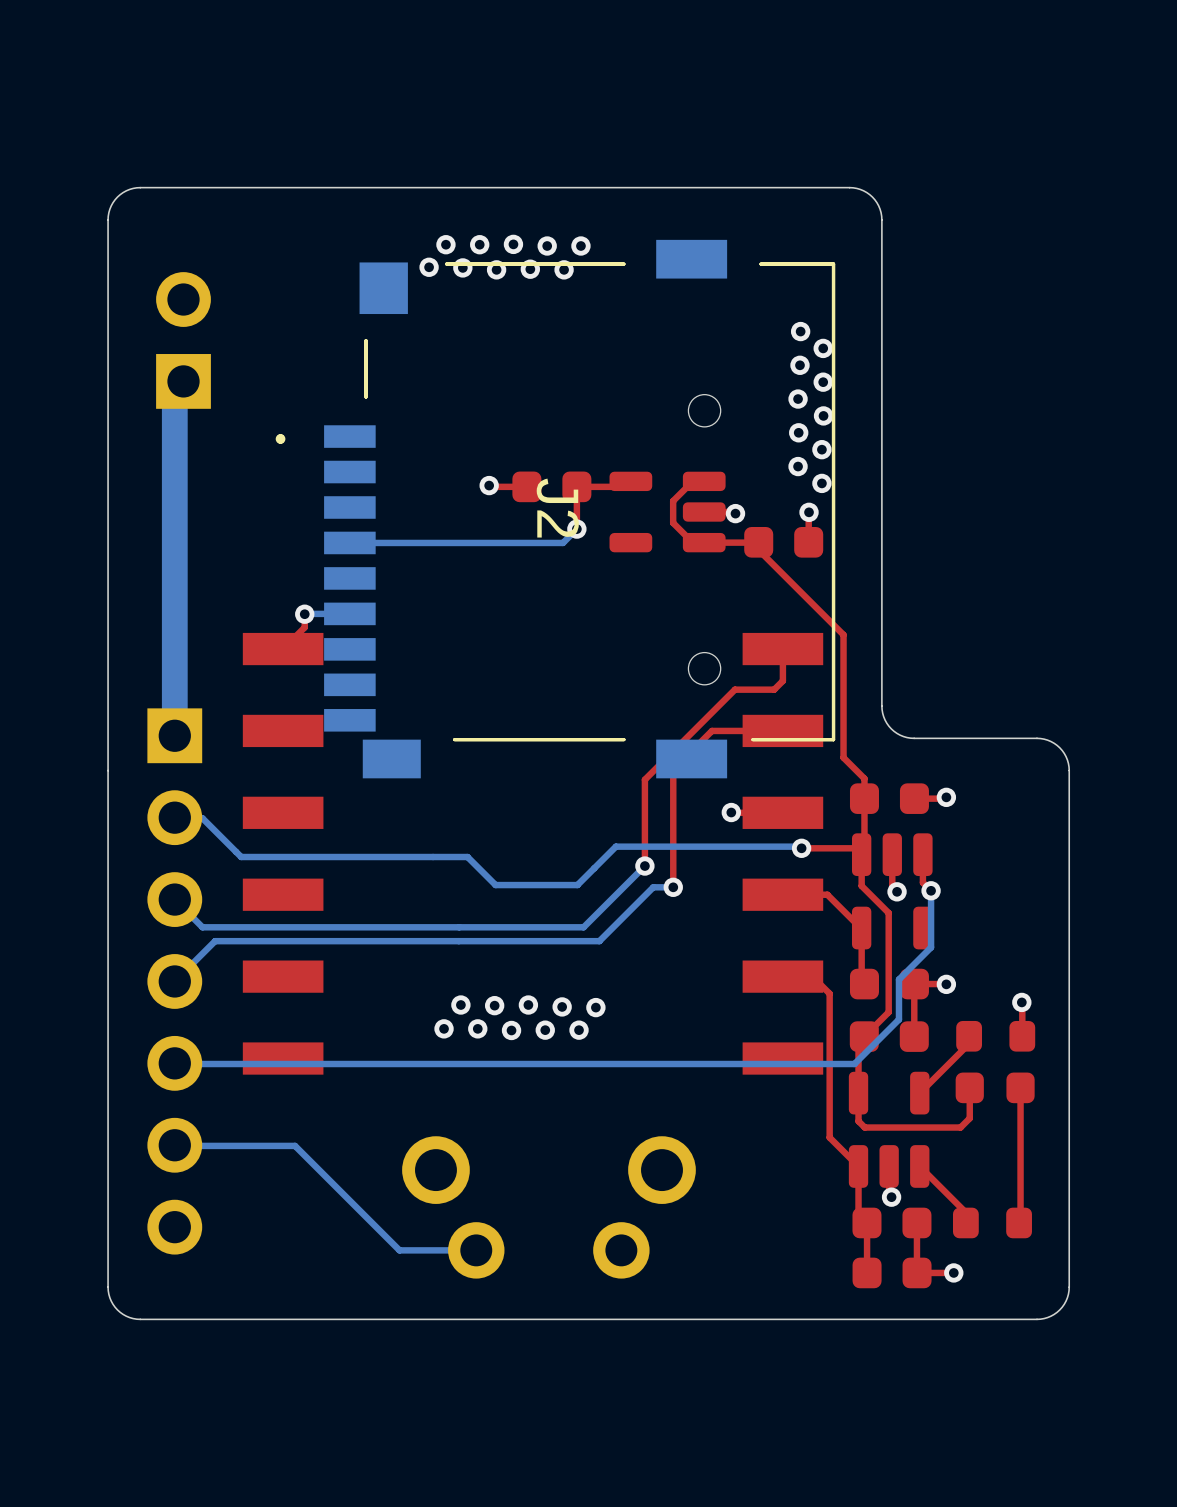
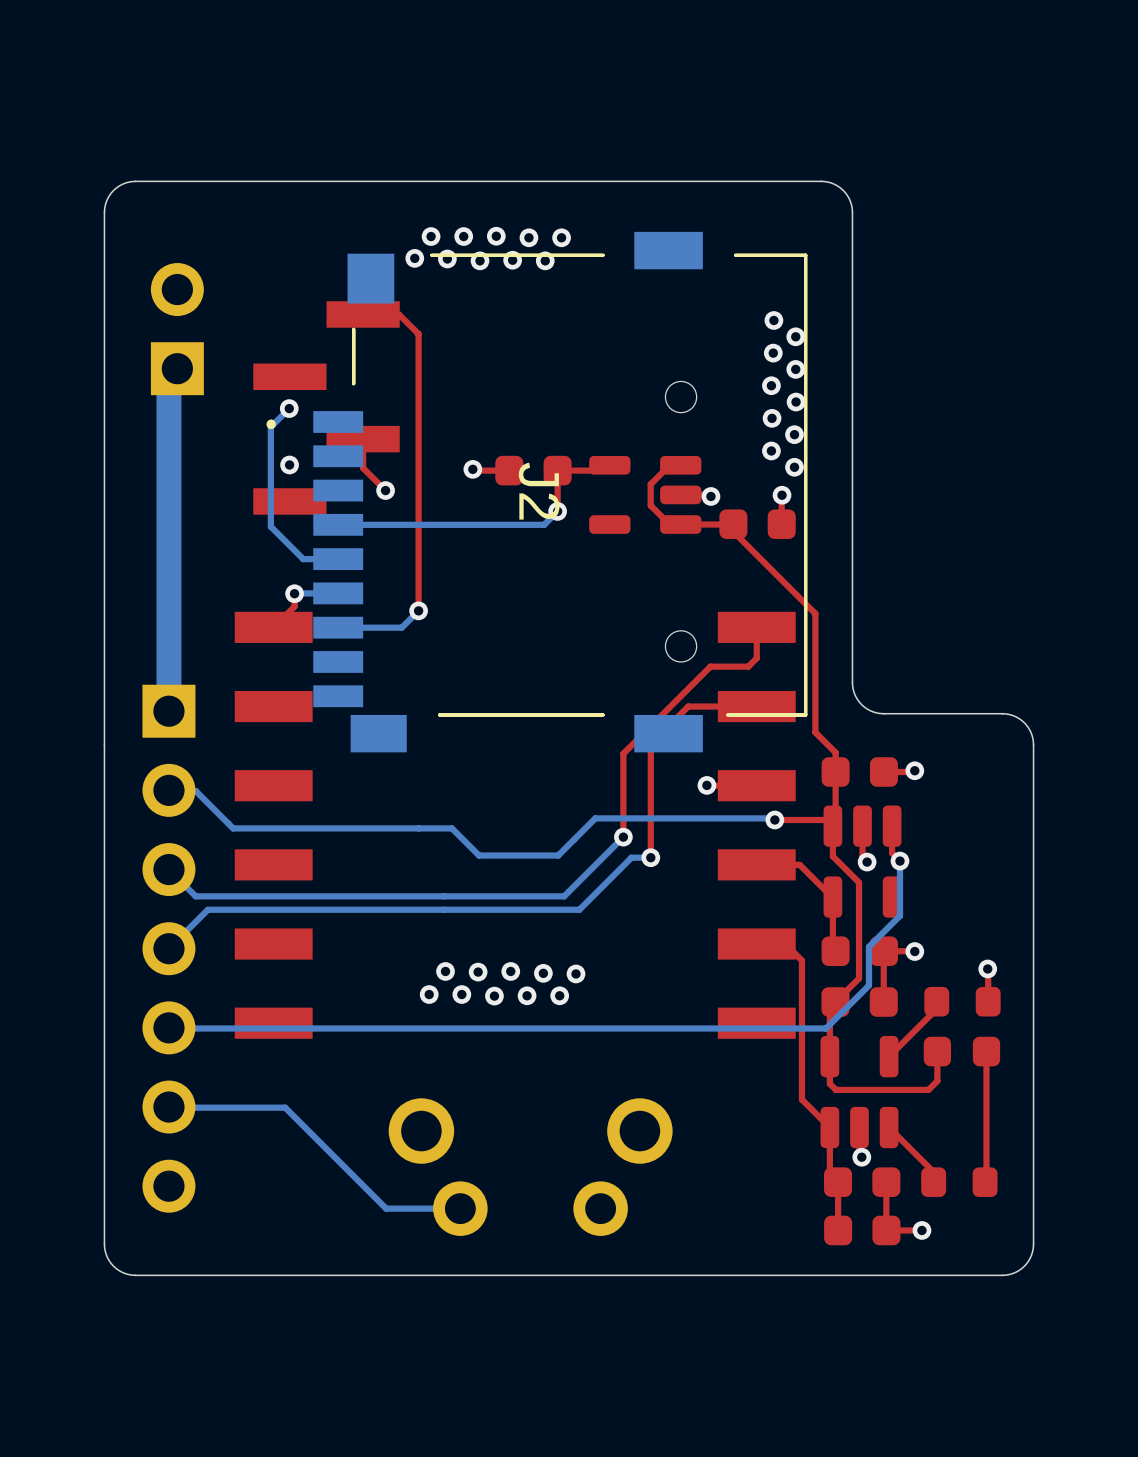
top track: none -> (363, 314) (398, 314) (418, 334) (418, 610)
bottom track: none -> (289, 408) (270, 427) (270, 526) (303, 559) (338, 559)
via: none -> (289, 408)
part: none -> (326, 407)
top track: none -> (363, 439) (363, 468) (385, 490)
via: none -> (289, 465)
via: none -> (385, 490)
bottom track: none -> (418, 610) (401, 627) (338, 627)
via: none -> (418, 610)

